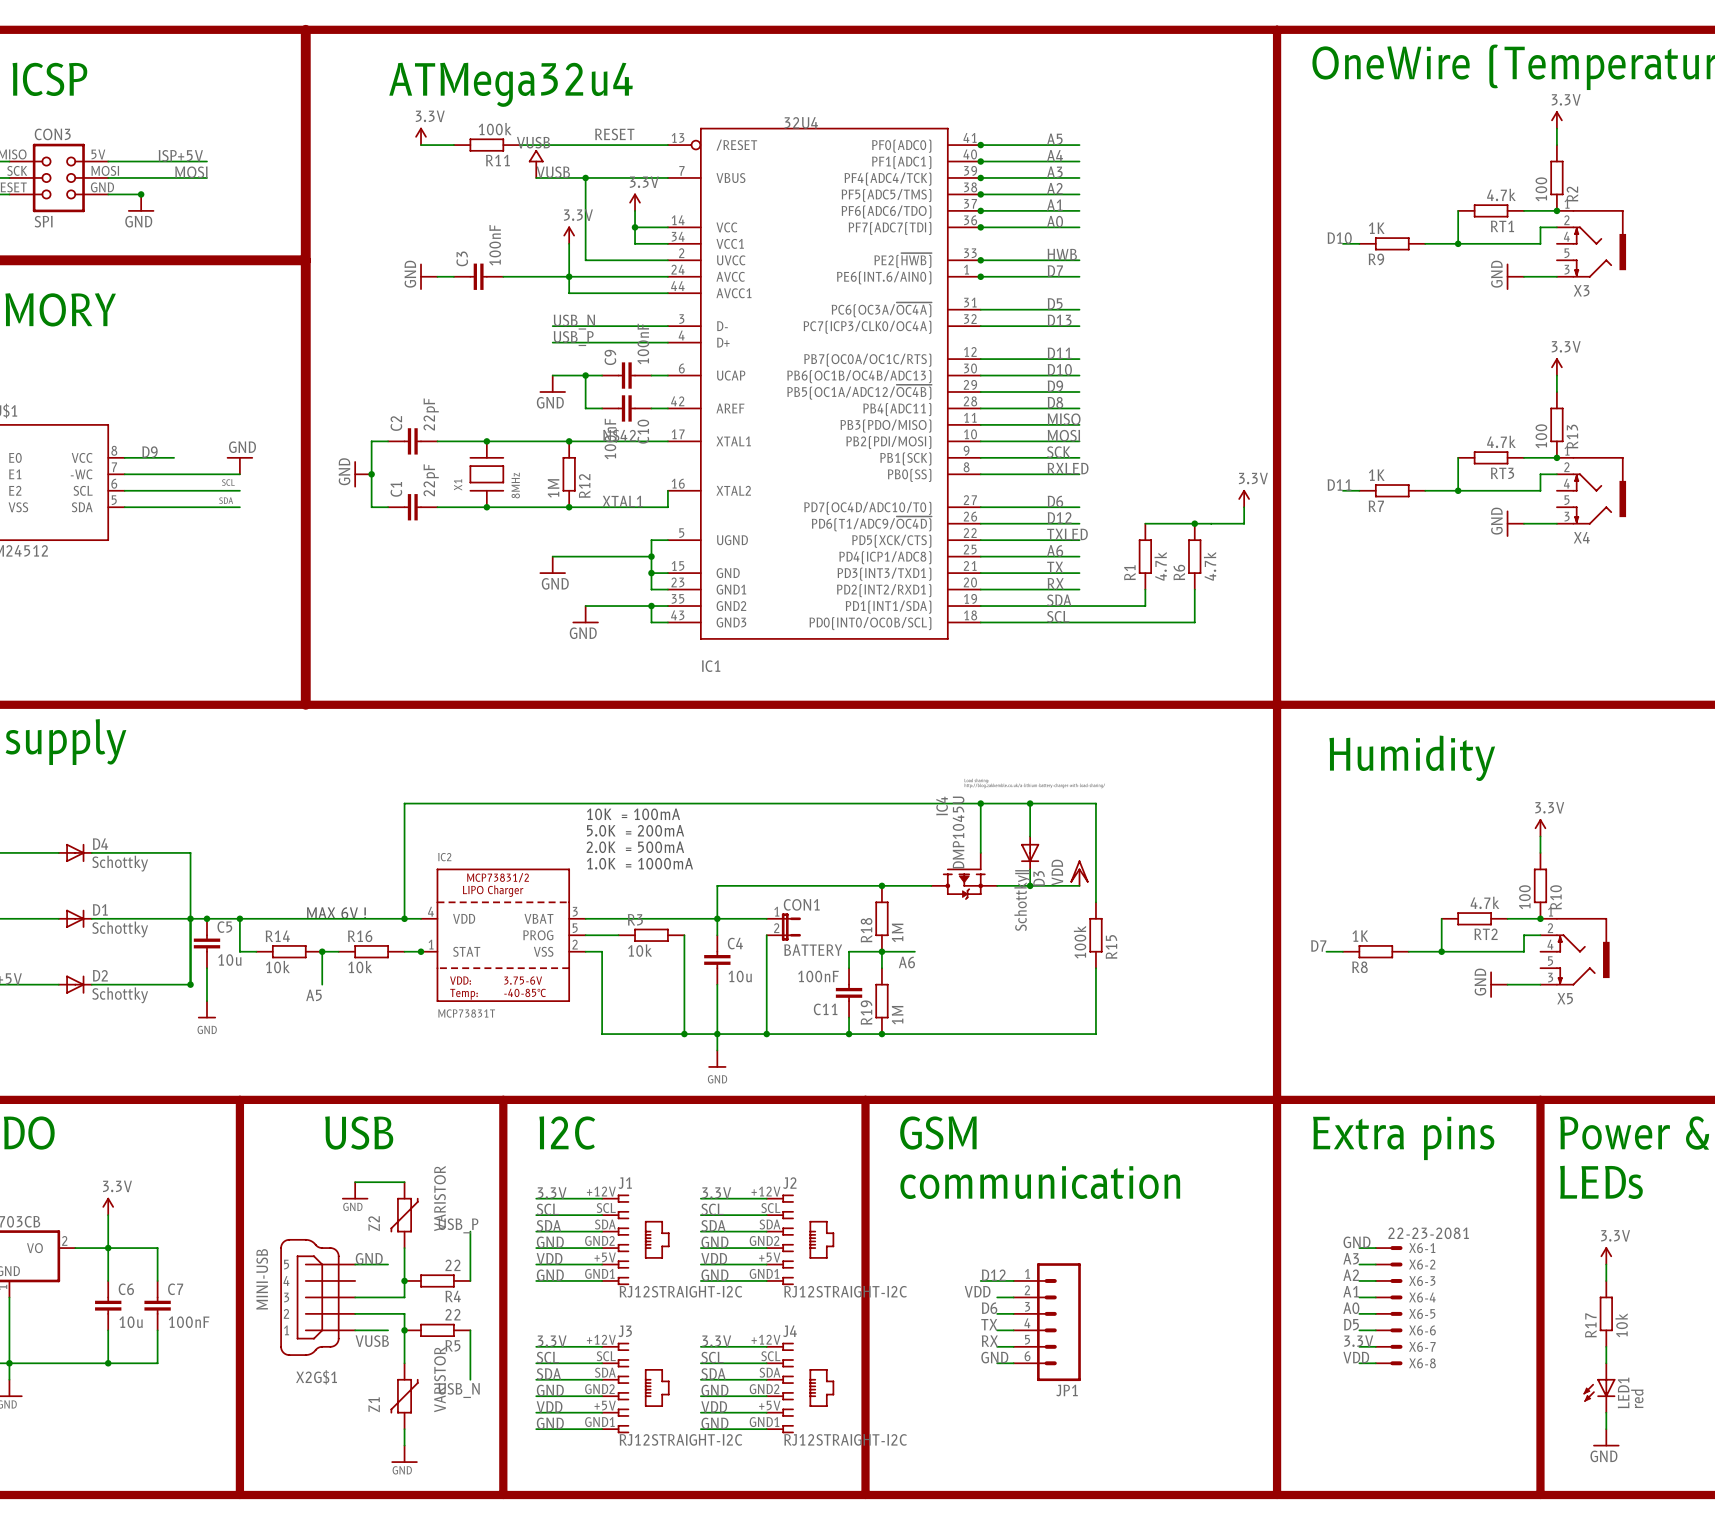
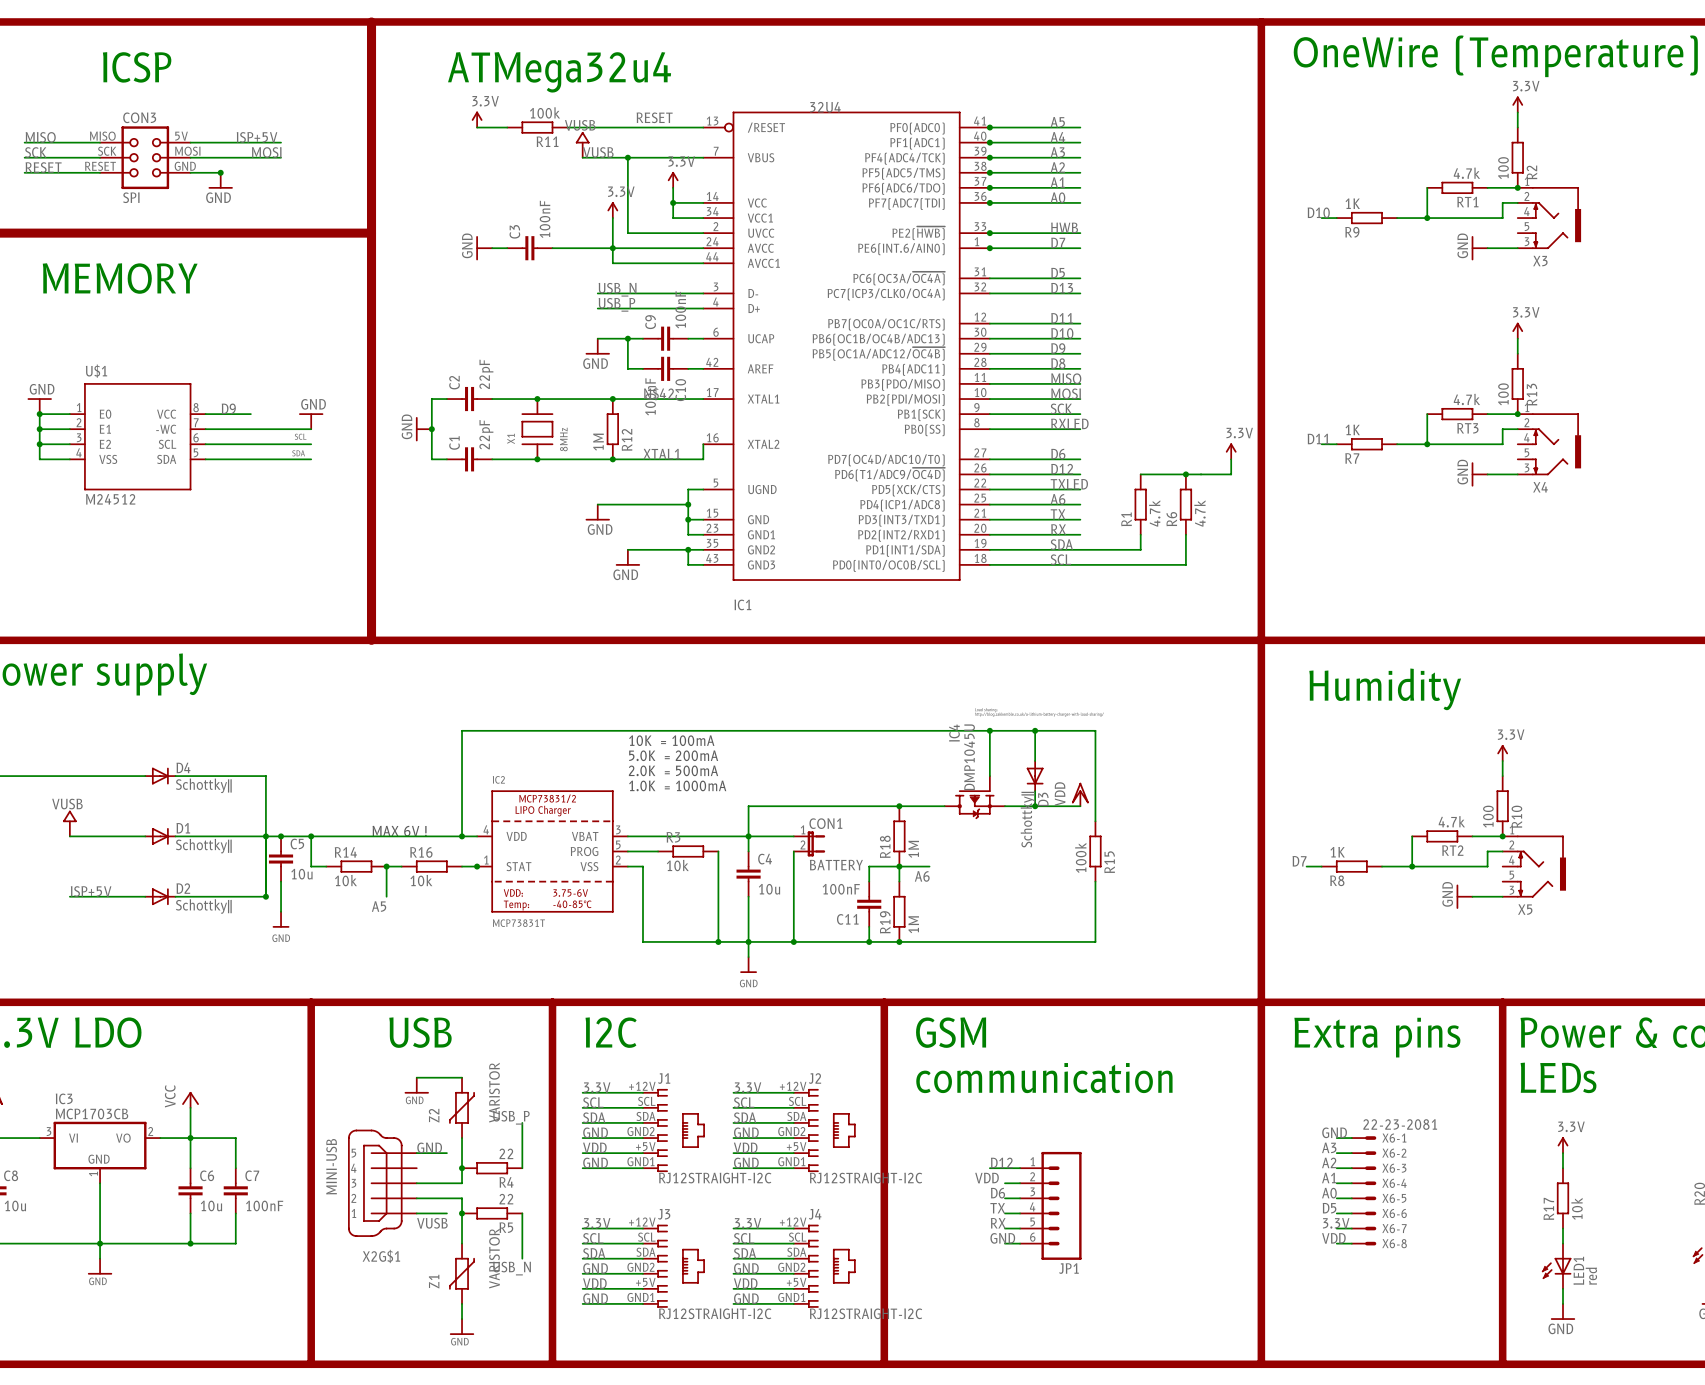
D4 value: Schottky (120, 863) -> Schottky|| (203, 785)
D1 value: Schottky (120, 929) -> Schottky|| (203, 846)
D2 value: Schottky (120, 995) -> Schottky|| (203, 906)
power symbol: 3.3V (108, 1206) -> VCC (190, 1099)

